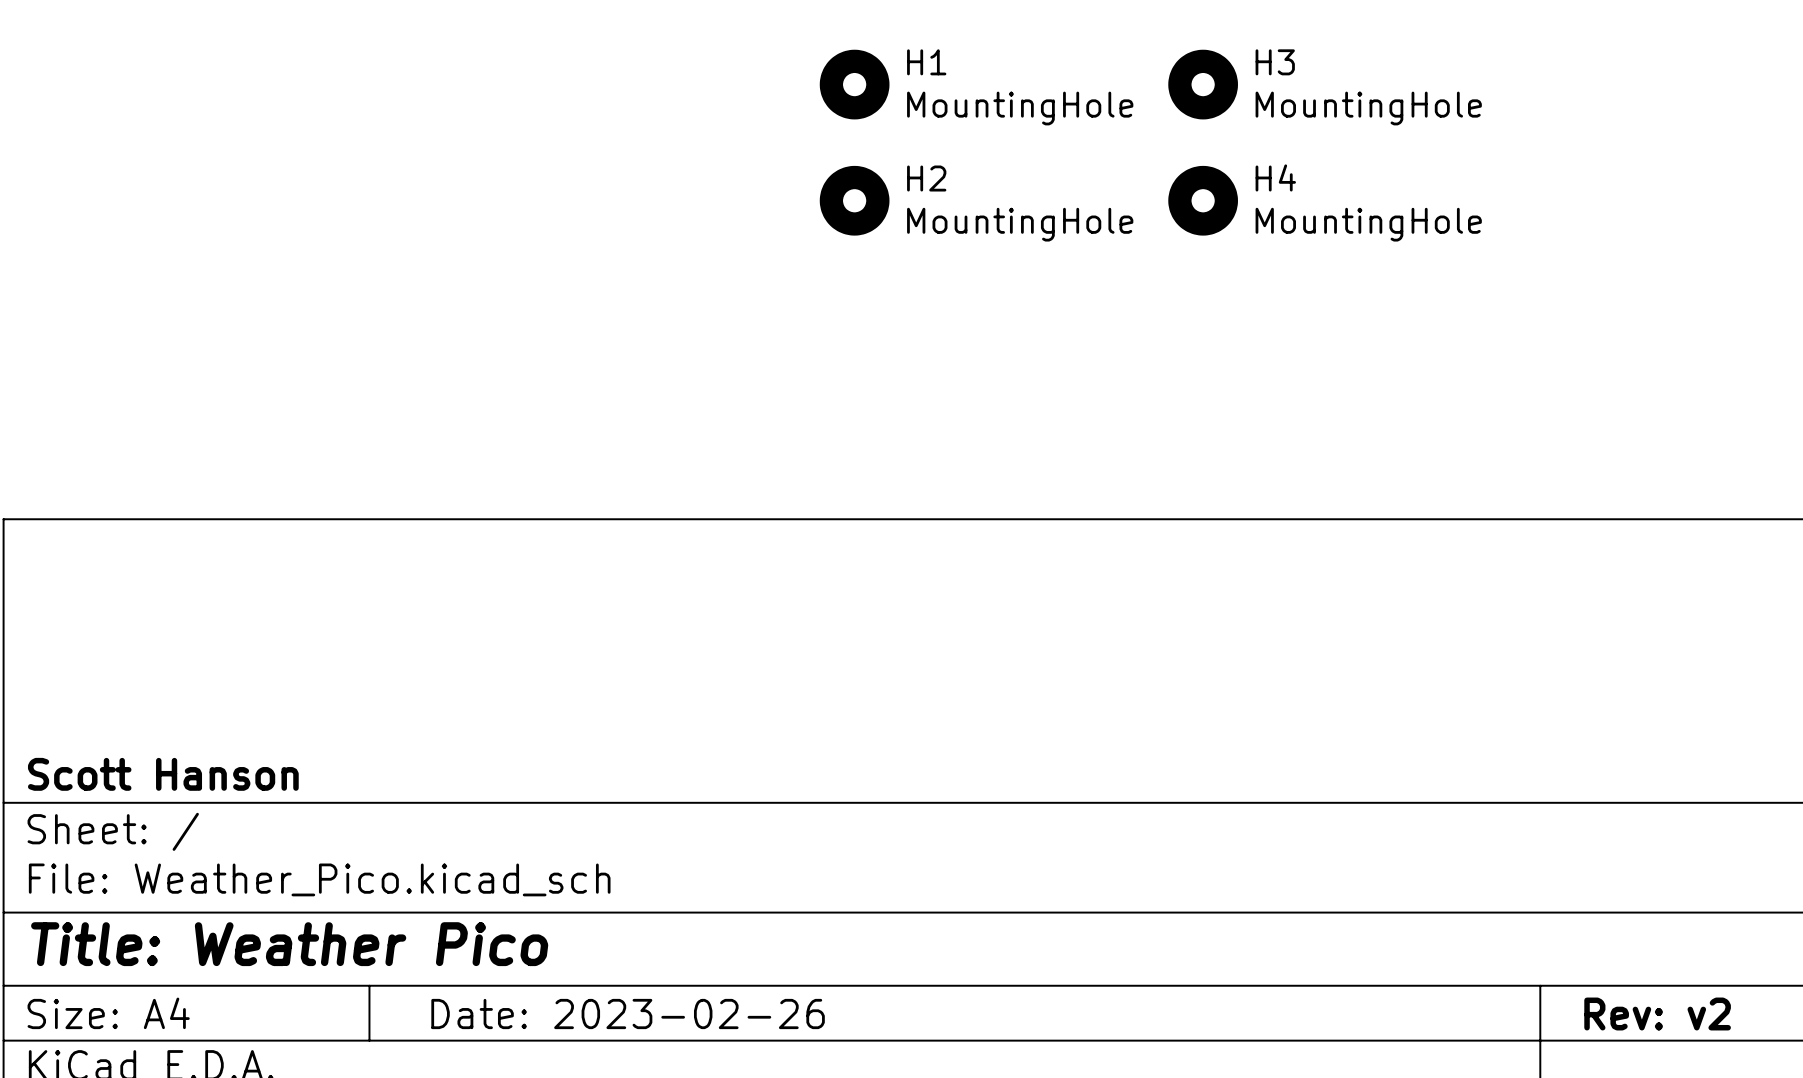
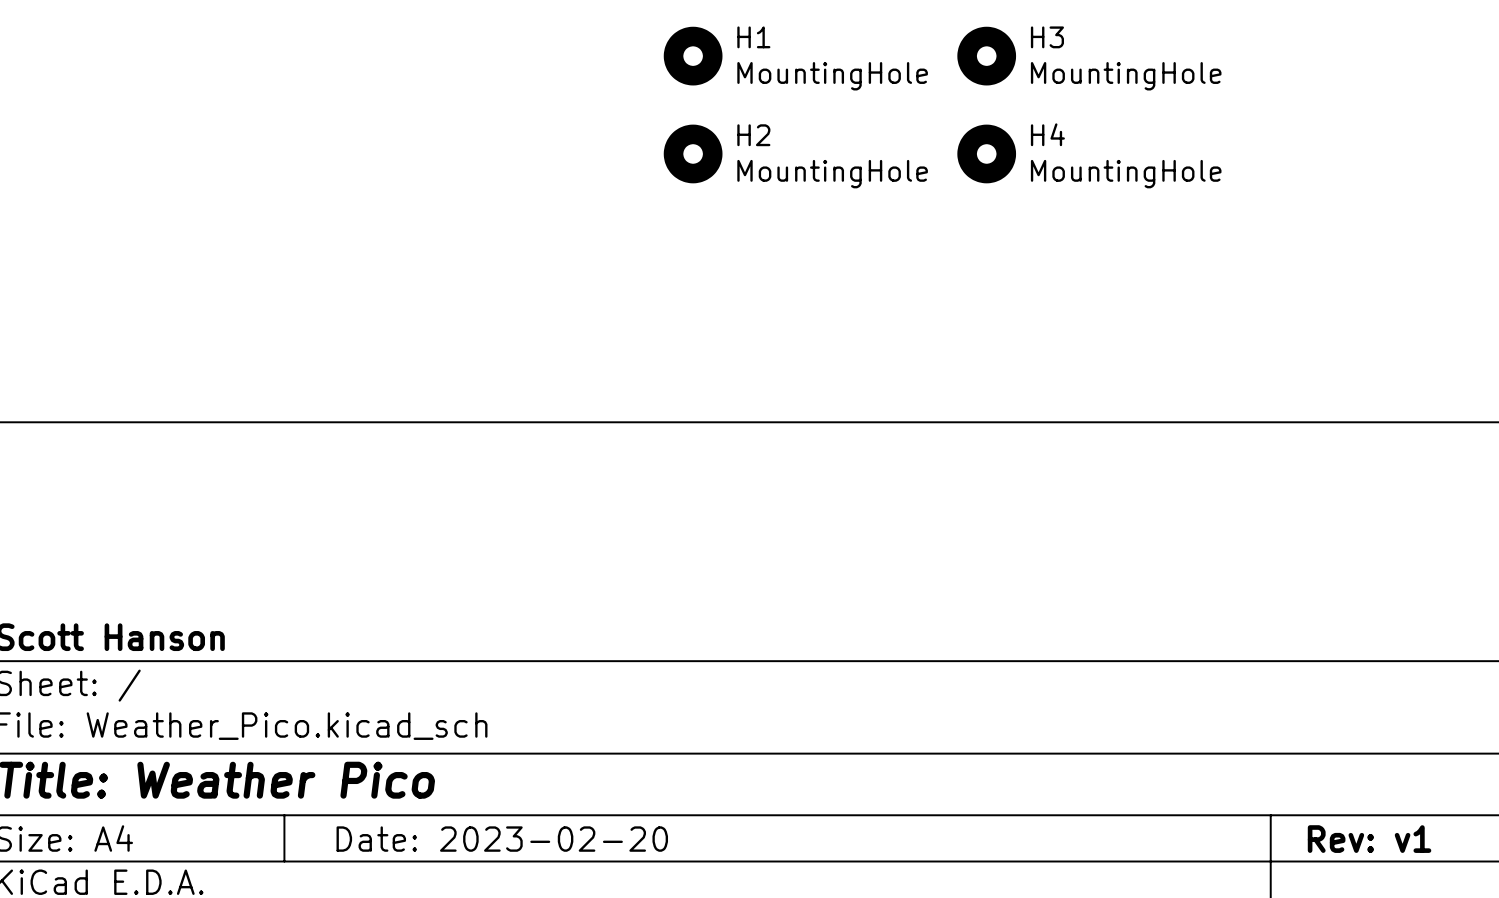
title block: Date: 2023-02-26 (628, 1014) -> Date: 2023-02-20 (502, 839)
title block: Rev: v2 (1657, 1014) -> Rev: v1 (1369, 839)

